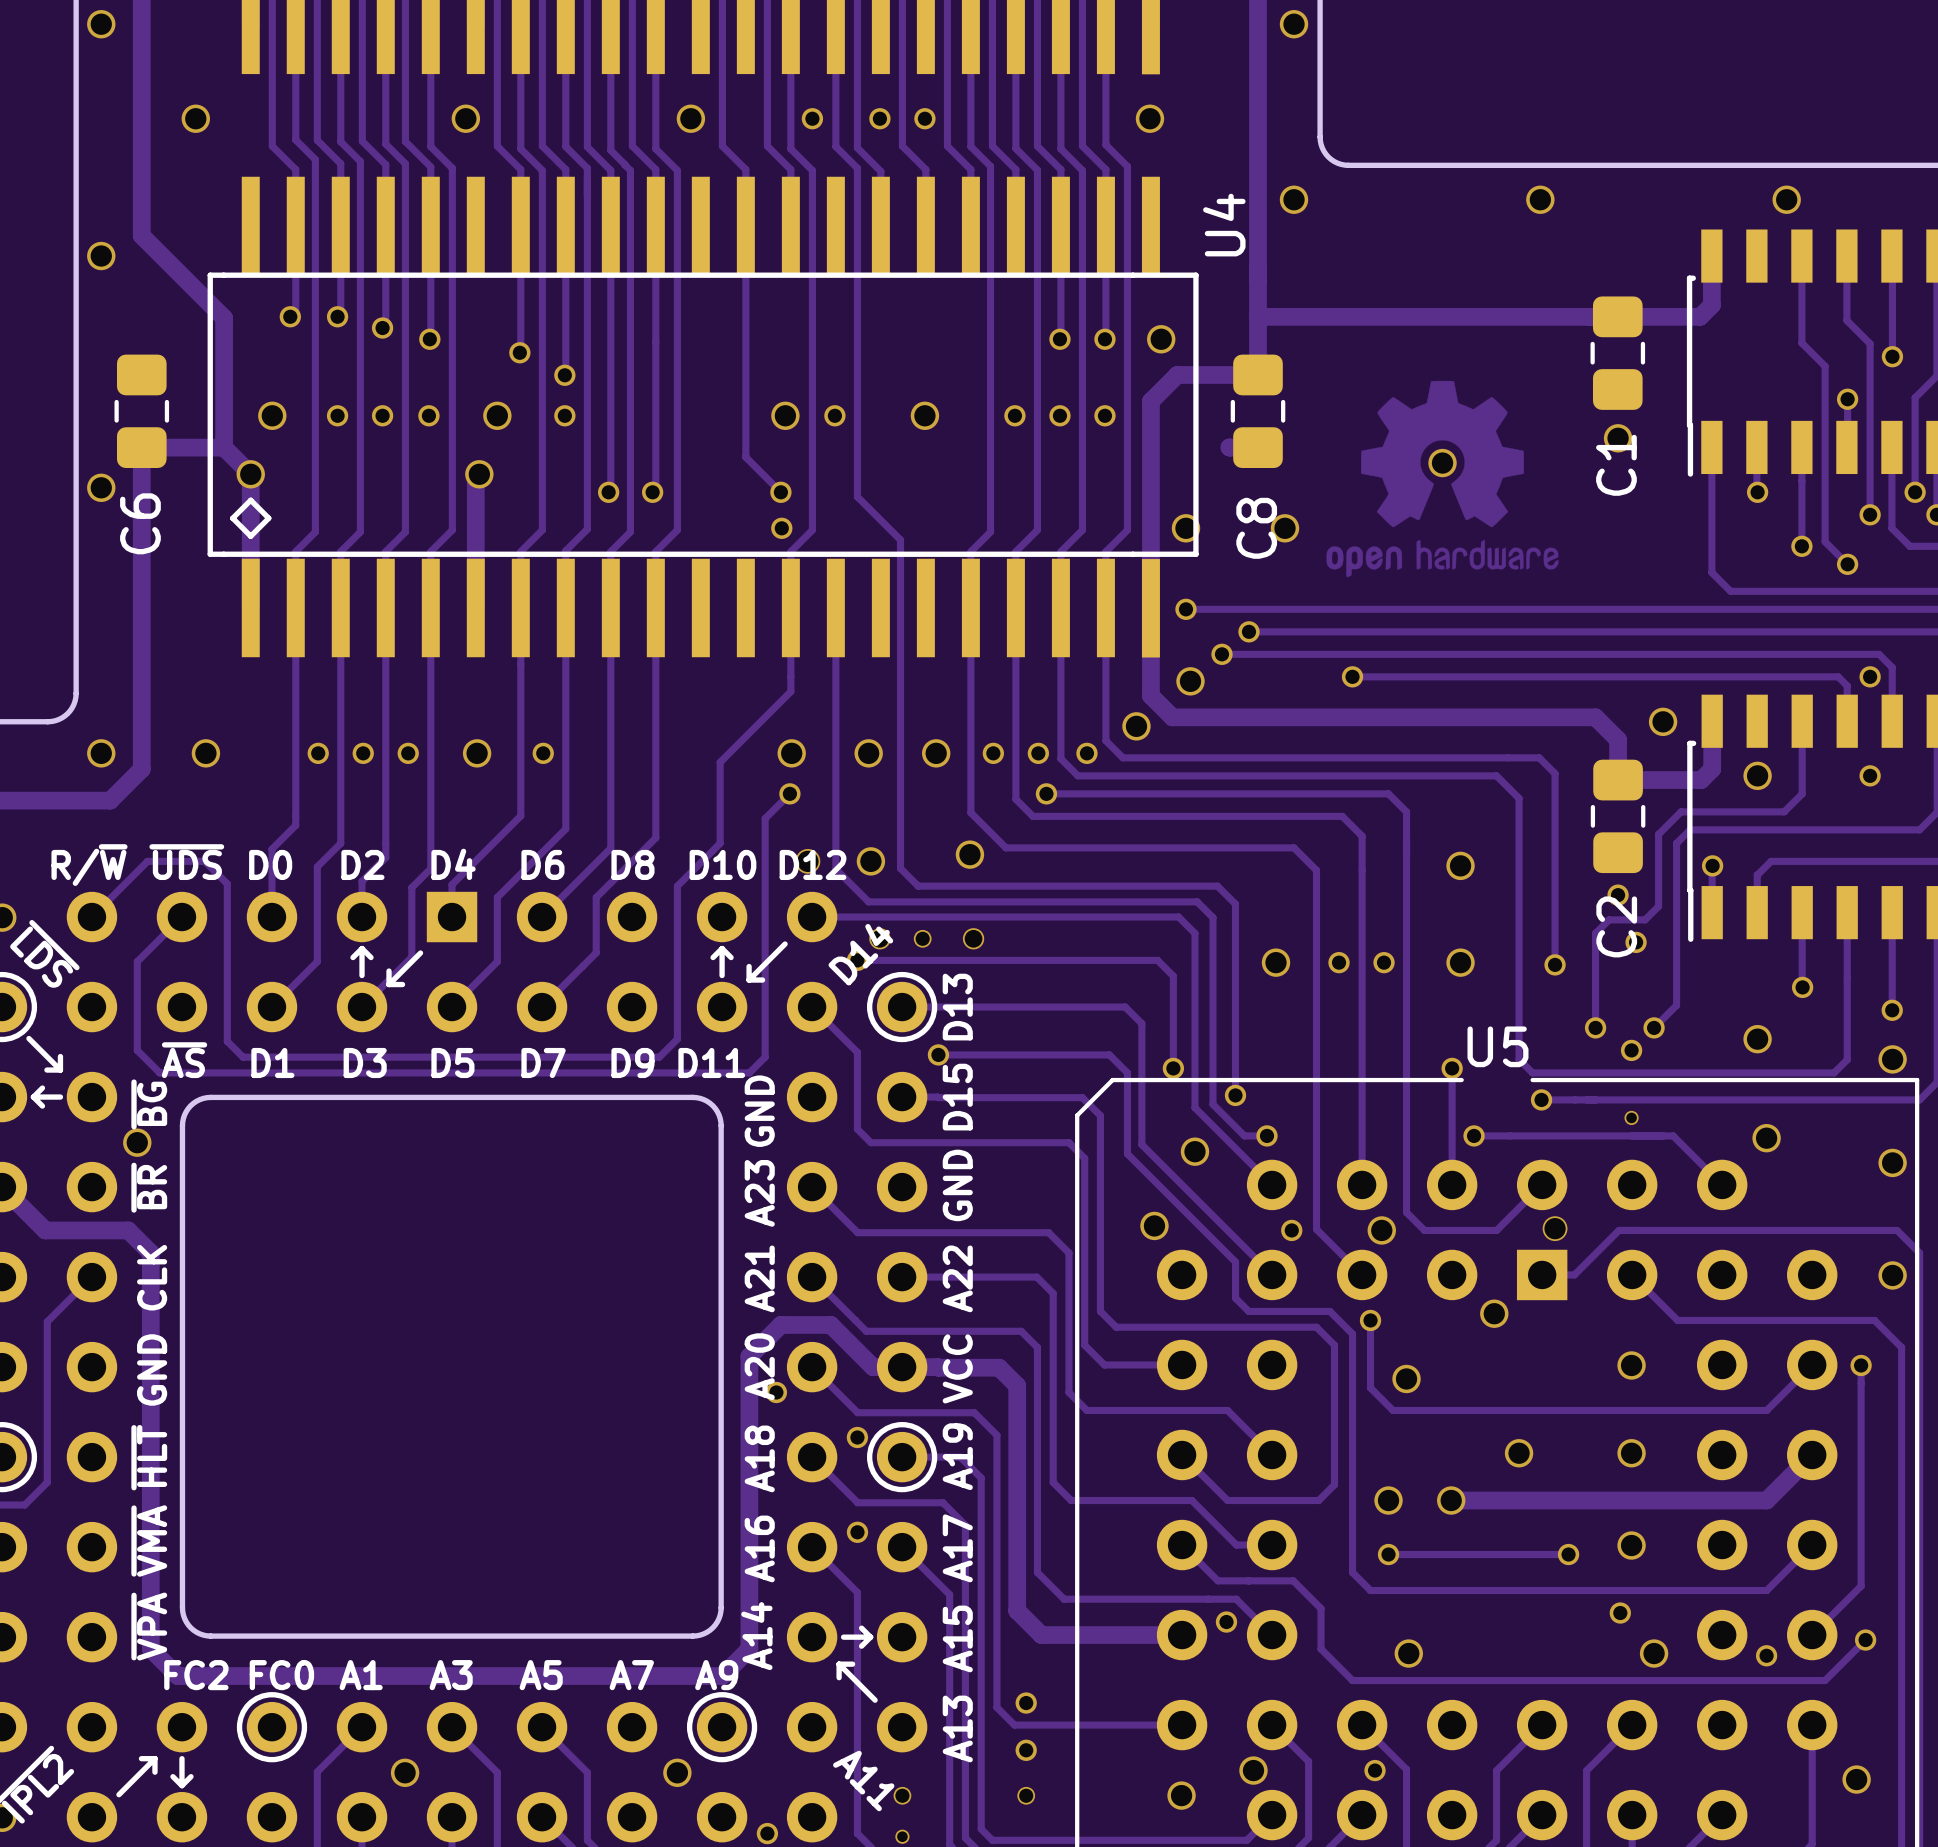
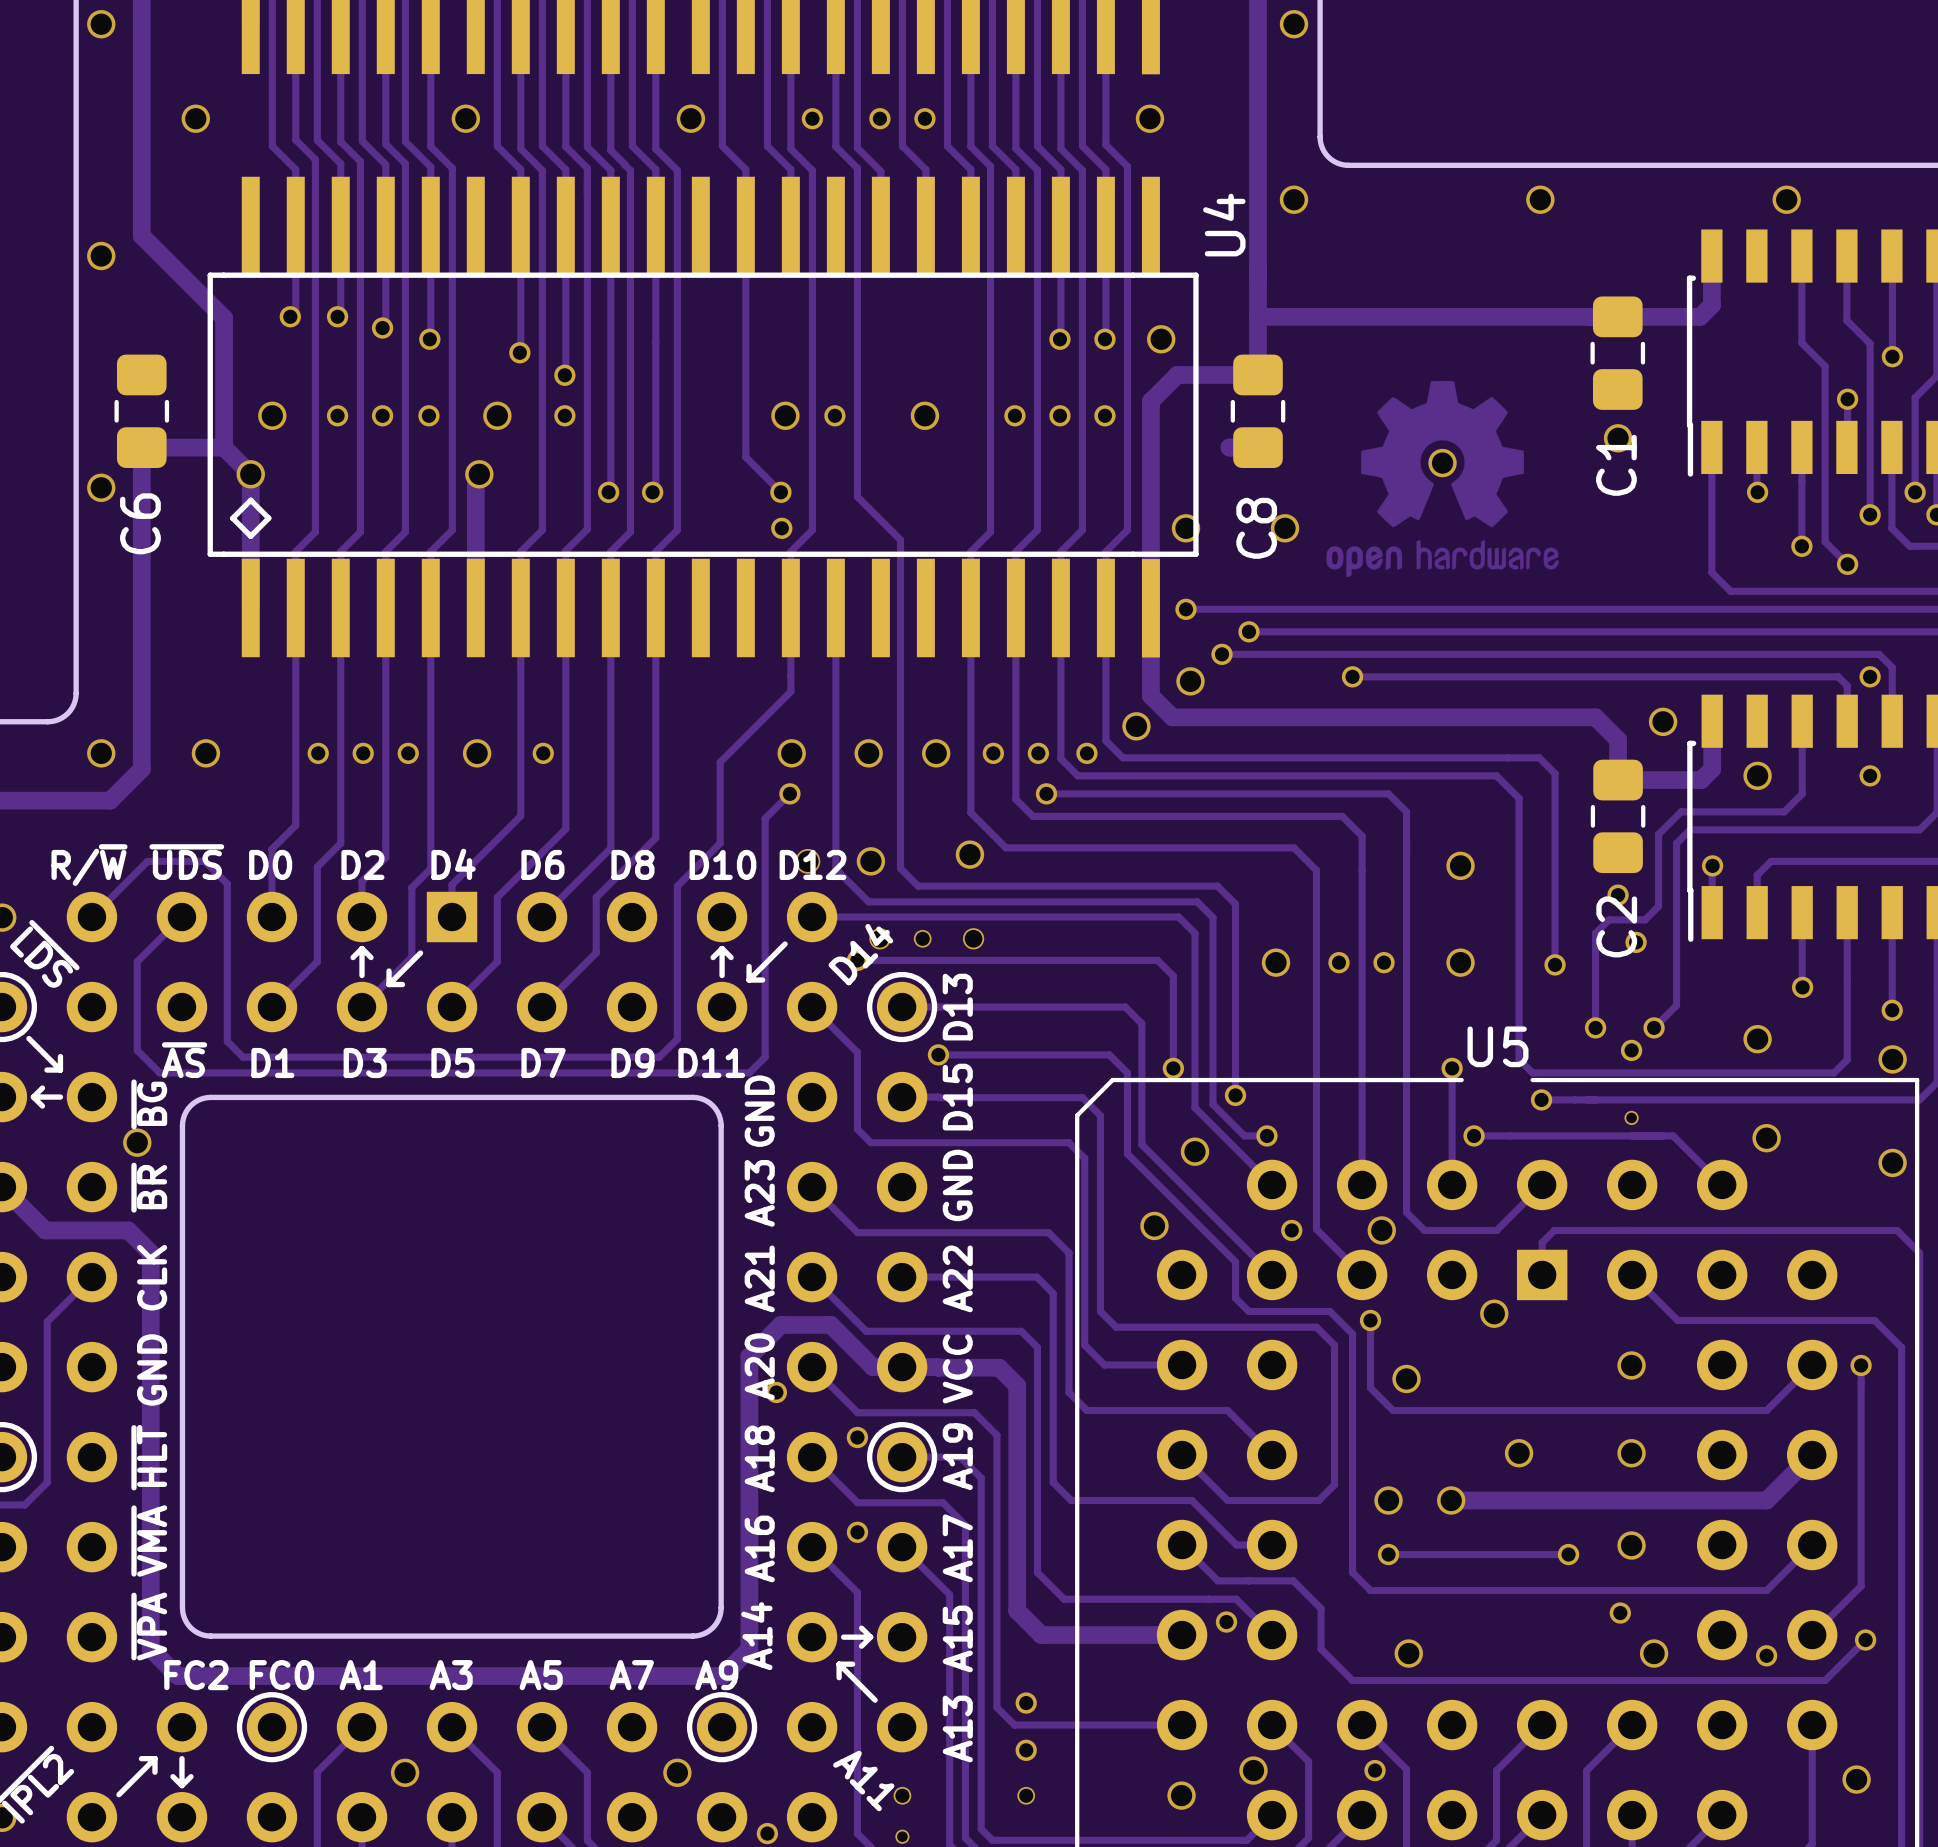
via: (1555, 1228) -> none
track: (1618, 1230) (1574, 1274) (1542, 1274) -> (1618, 1230) (1554, 1230) (1542, 1242) (1542, 1274)
via: (1892, 1275) -> none

